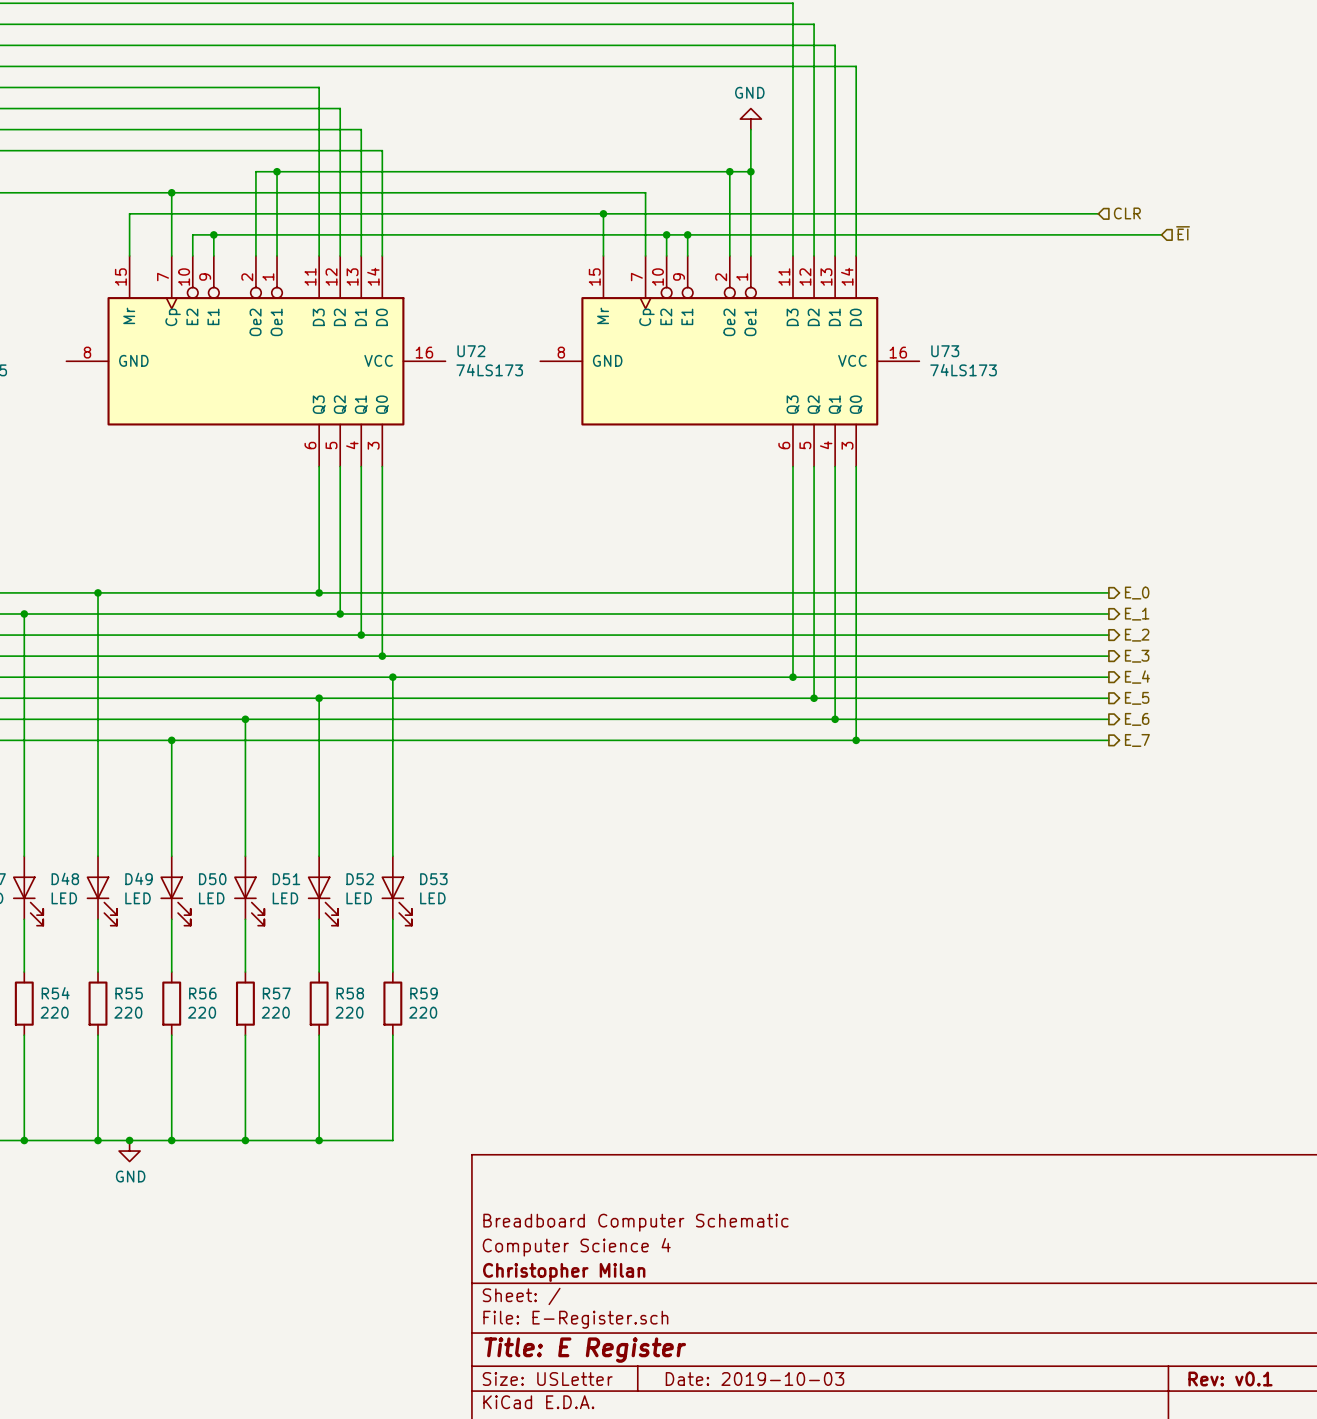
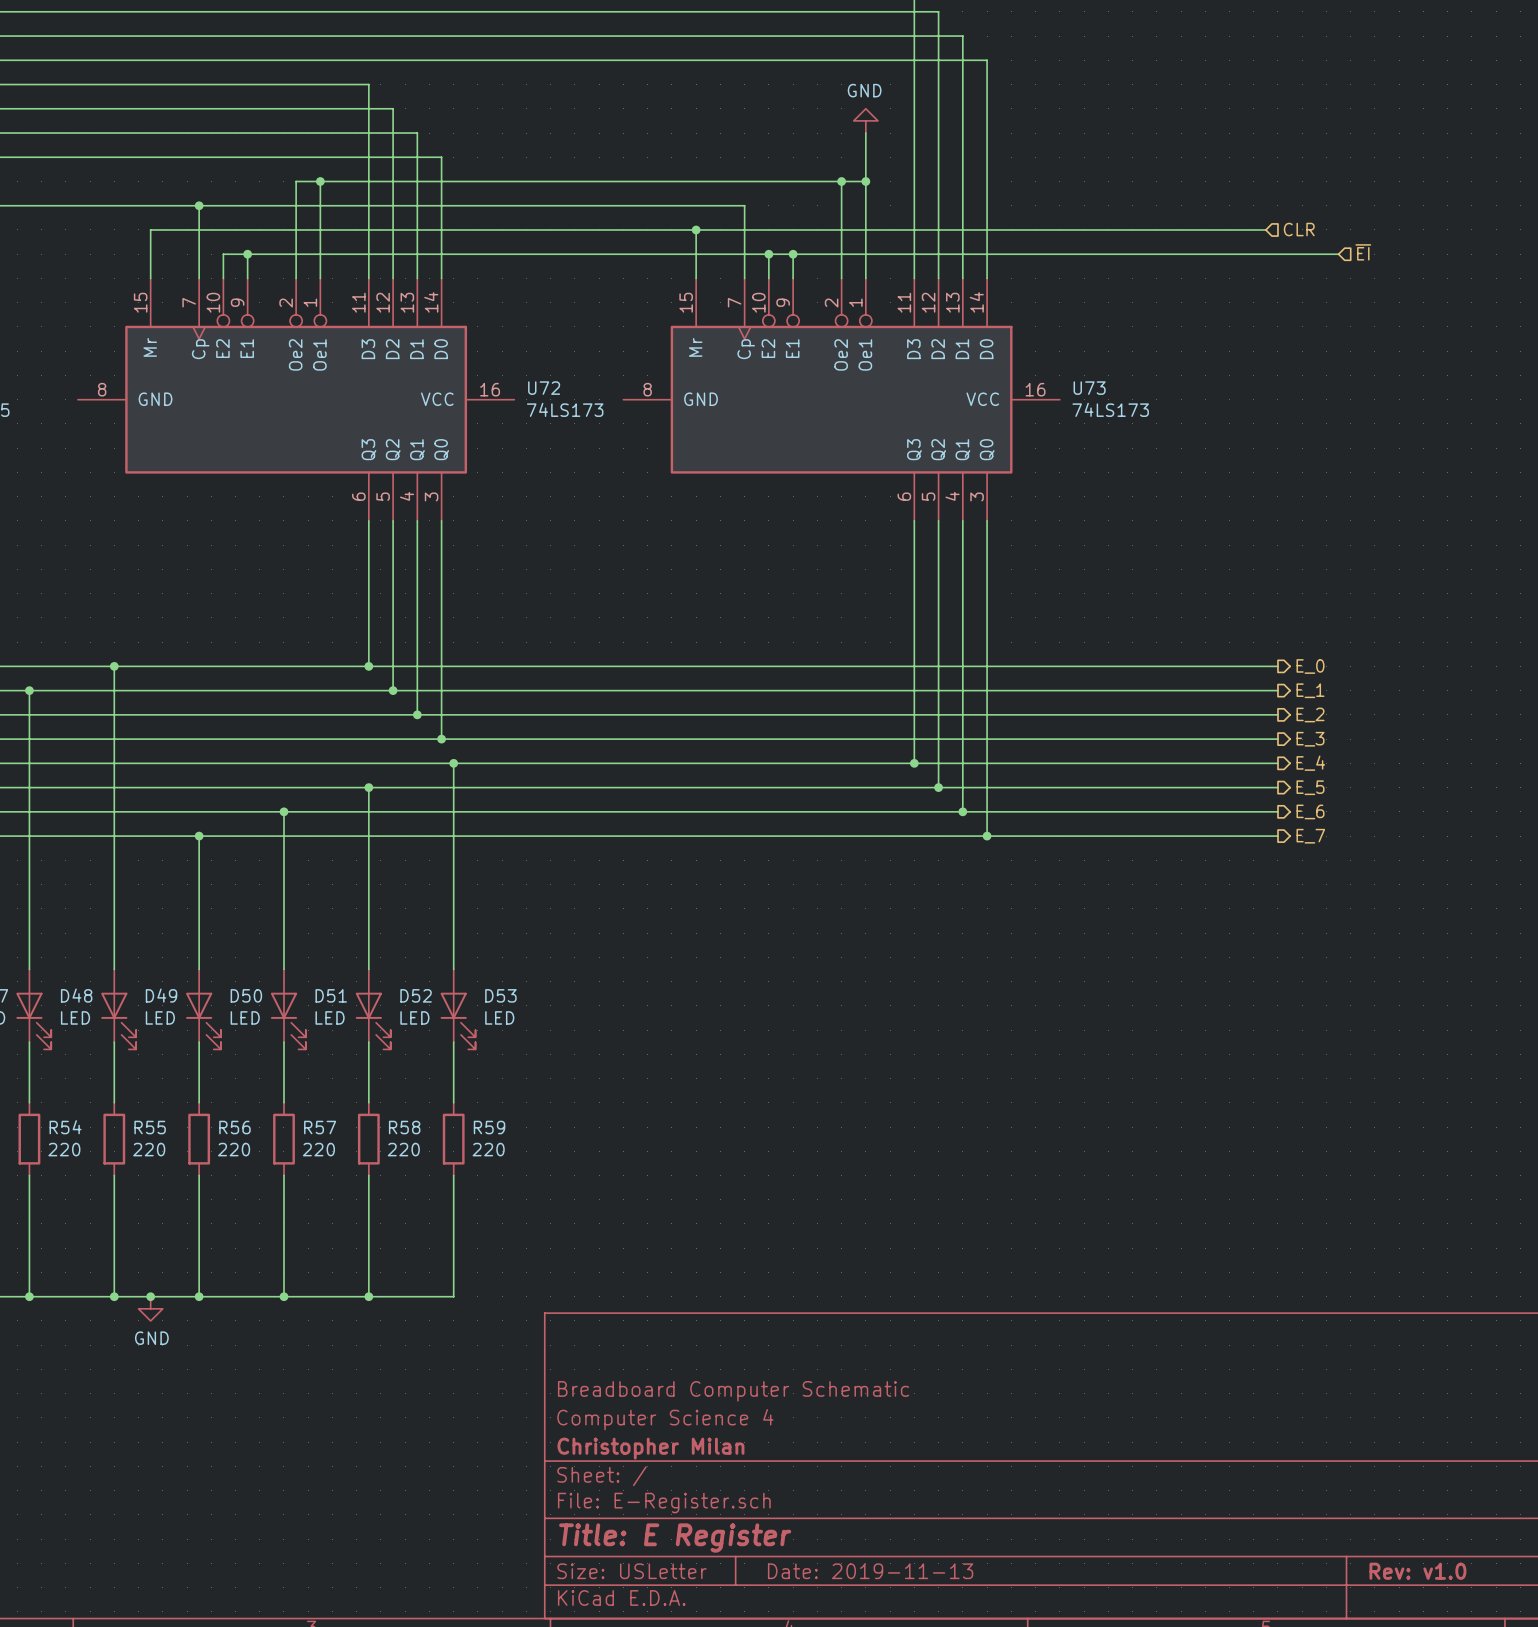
title block: Date: 2019-10-03 (754, 1379) -> Date: 2019-11-13 (870, 1571)
title block: Rev: v0.1 (1230, 1379) -> Rev: v1.0 (1417, 1571)

